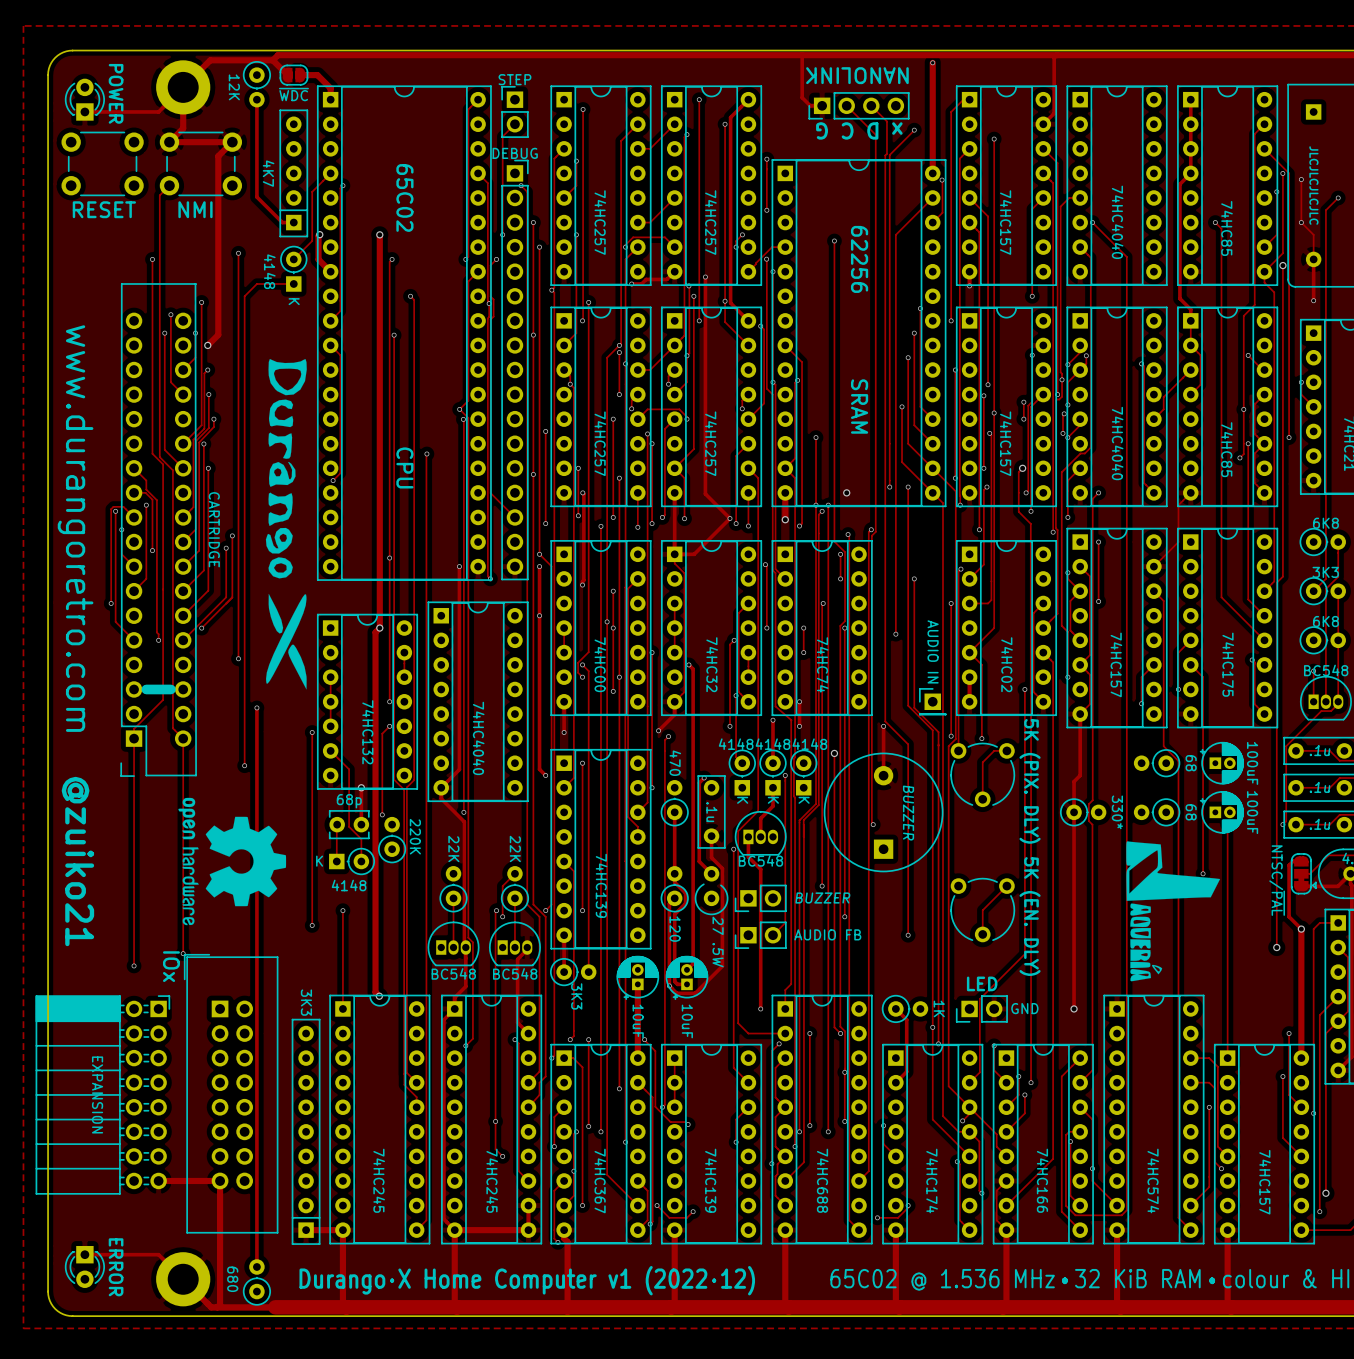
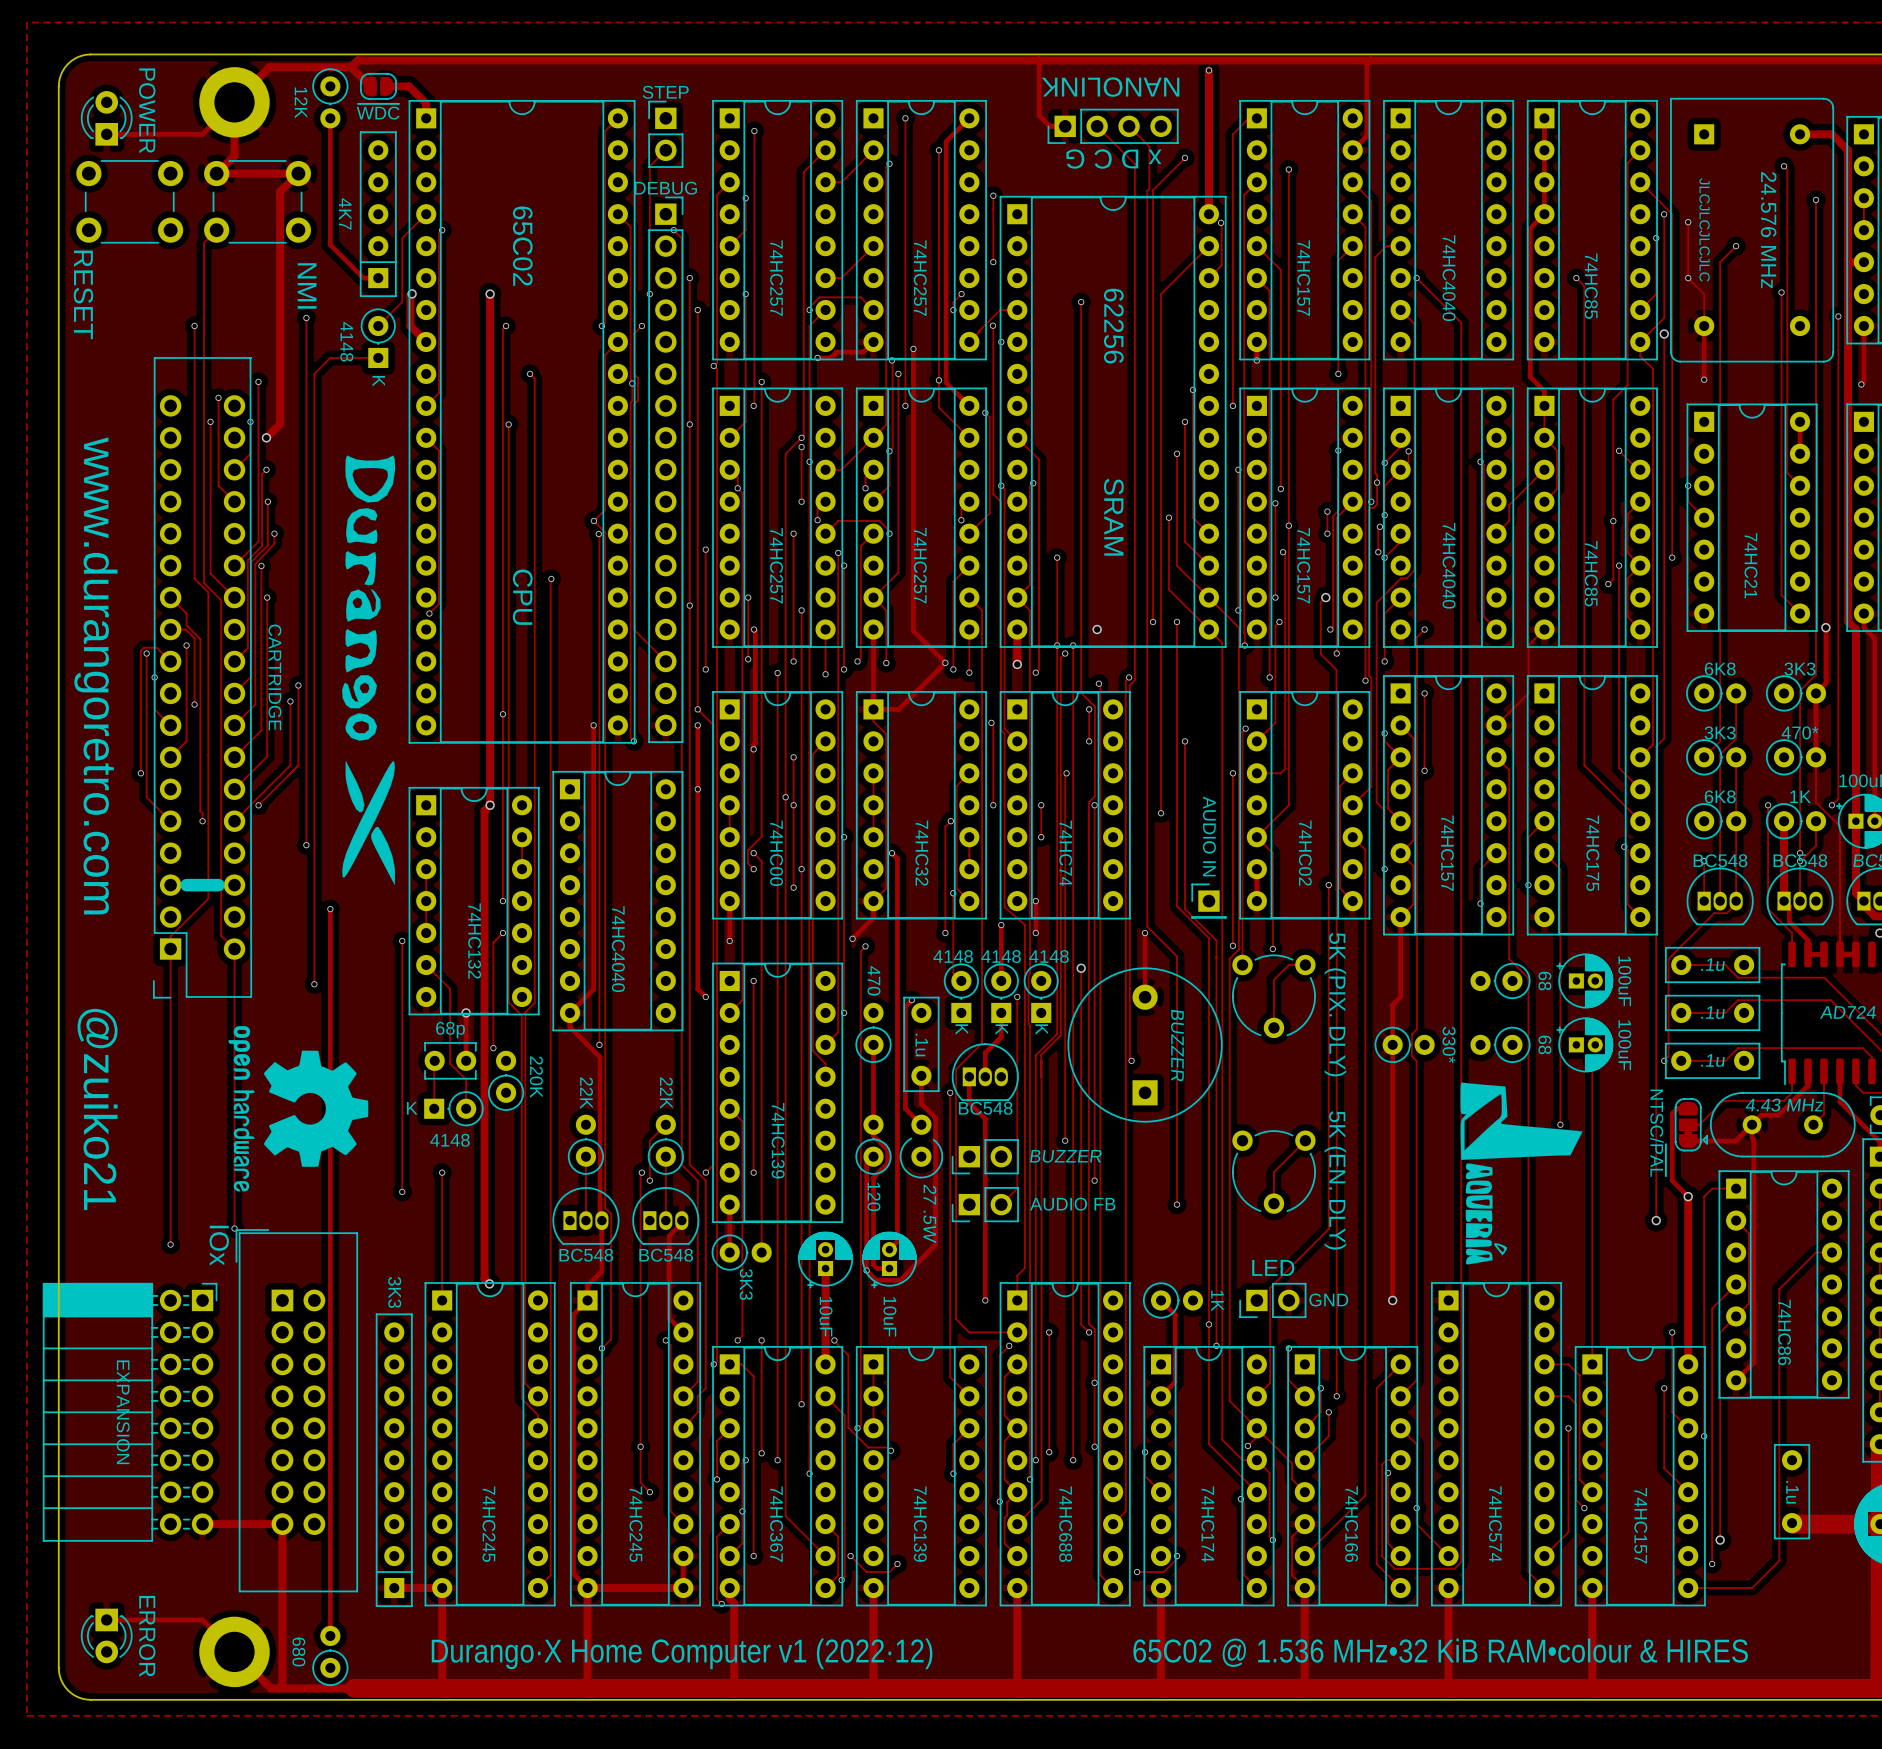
part value rotation: 0° (104, 209) -> 90° clockwise (83, 294)
part value rotation: 0° (195, 209) -> 90° clockwise (307, 285)

